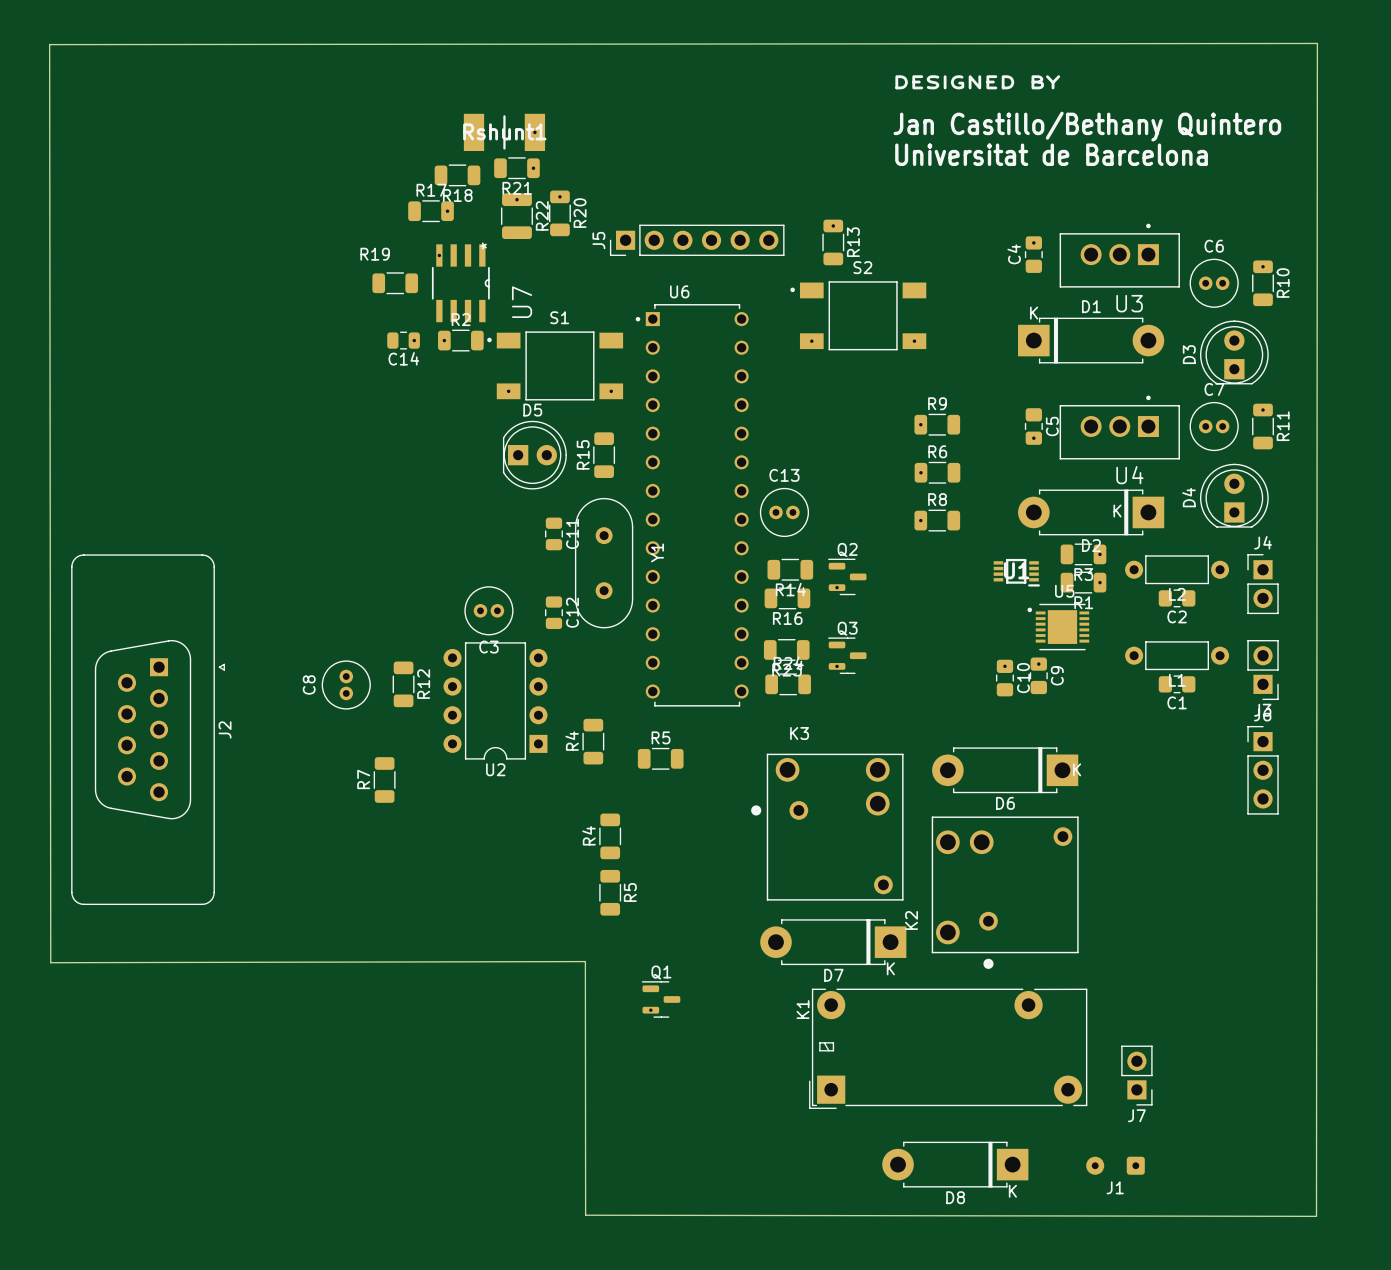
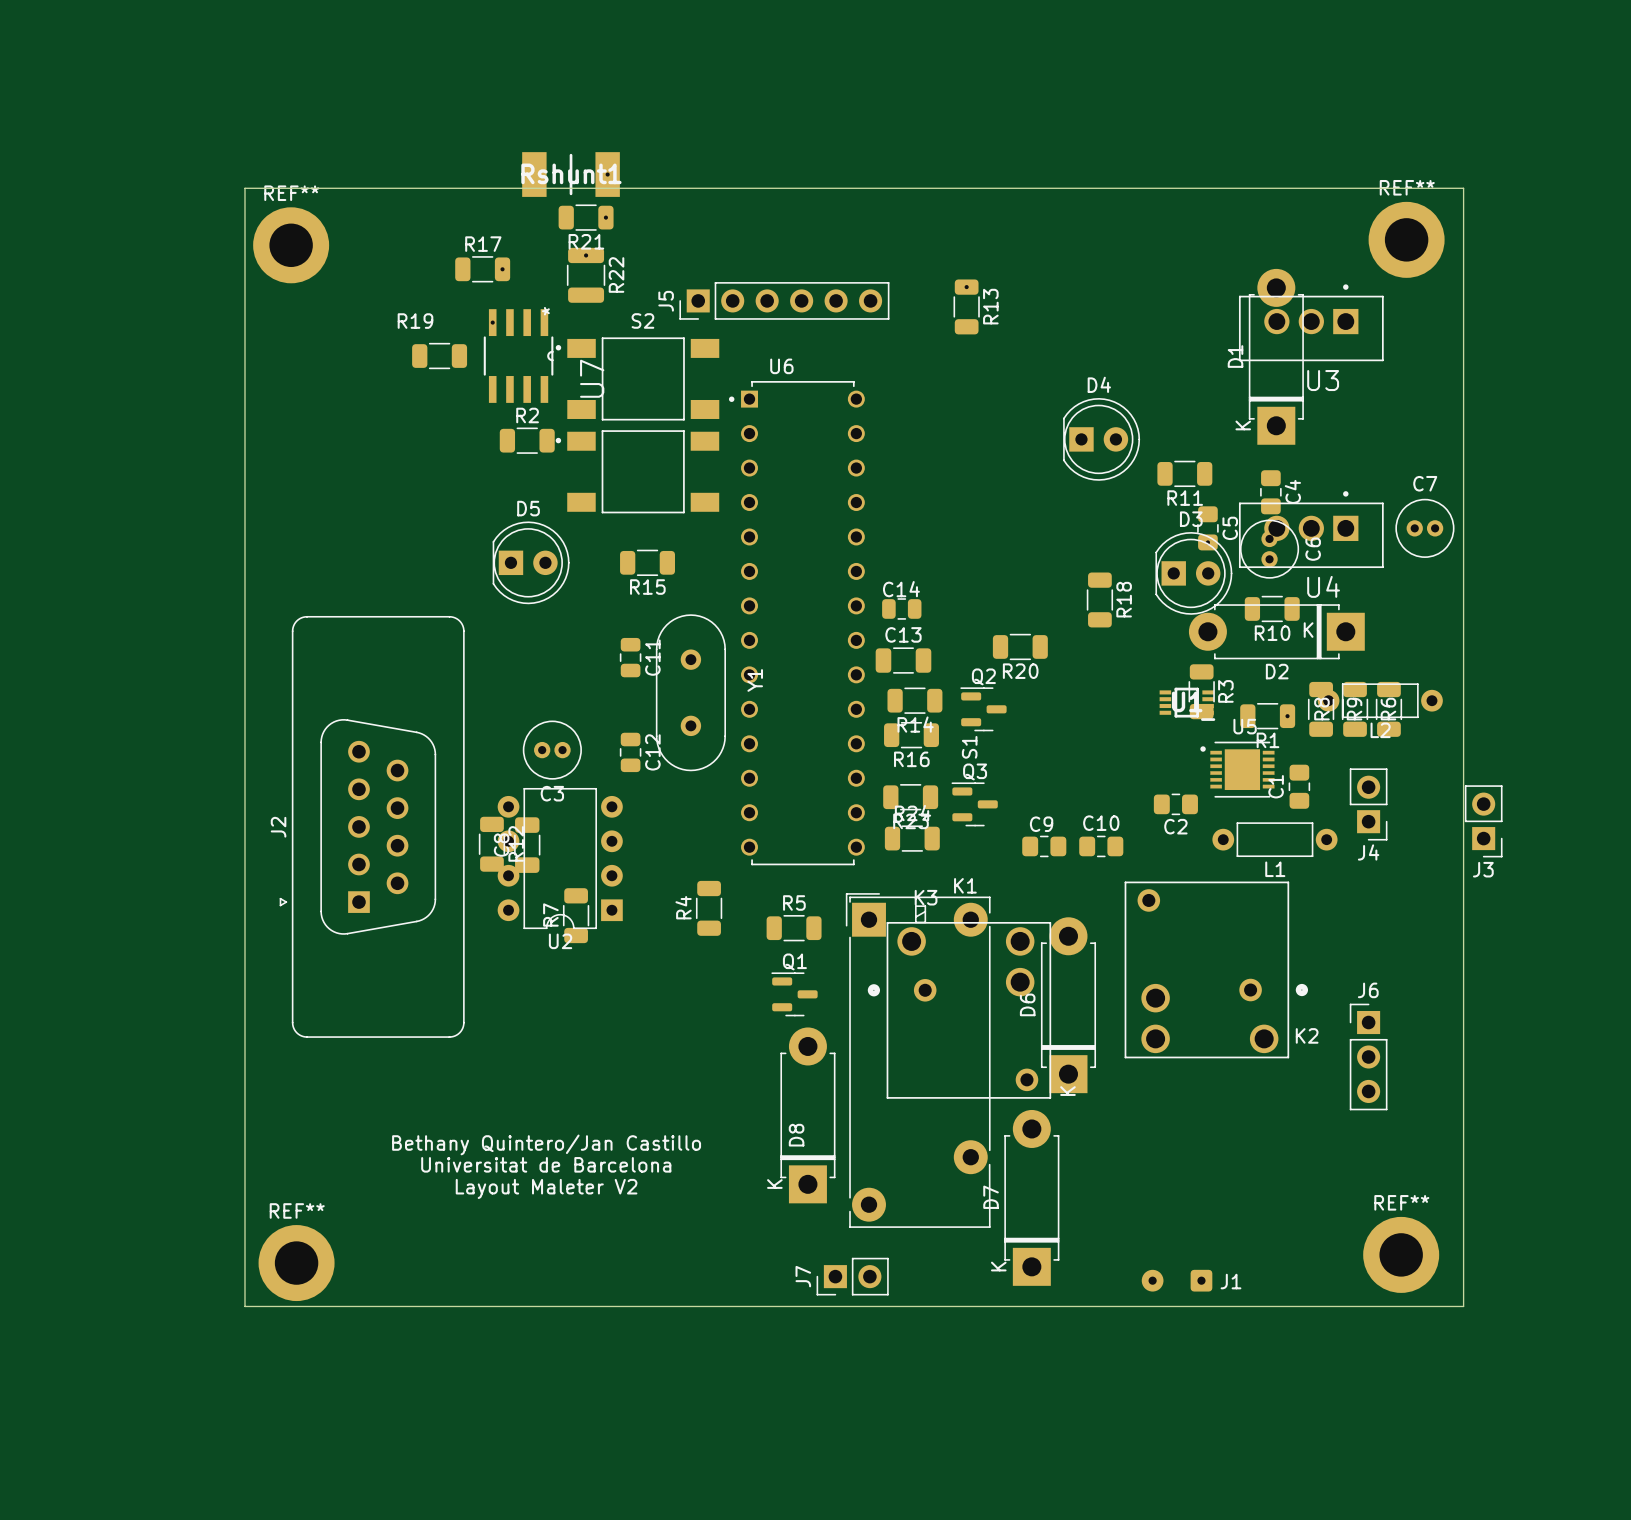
board edge: (1317, 43) (49, 44) (50, 962) (585, 961) (585, 1215) (1316, 1216) (1317, 43) -> (244, 188) (244, 1306) (1463, 1306) (1463, 188) (244, 188)
text: DESIGNED BY (977, 82) -> none
text: Jan Castillo/Bethany Quintero (1087, 126) -> none
text: Universitat de Barcelona (1051, 154) -> none
R18 rotation: 0° (457, 175) -> 90° clockwise (1099, 599)
R18 position: (457, 175) -> (1099, 599)
REF**: none -> (1406, 239)
R20 footprint: [549, 190, 571, 237] -> [992, 633, 1048, 661]
REF**: none -> (291, 245)
R18 name position: R18 (457, 195) -> R18 (1124, 599)
R20 name position: R20 (580, 213) -> R20 (1020, 671)
C4 footprint: [1024, 236, 1043, 273] -> [1260, 470, 1282, 515]
J5 position: (697, 240) -> (784, 300)
C4 name position: C4 (1014, 254) -> C4 (1292, 491)
R10 footprint: [1252, 260, 1274, 307] -> [1244, 595, 1300, 623]
S2 footprint: [790, 281, 927, 351] -> [555, 337, 720, 421]
C6 rotation: 0° (1214, 283) -> 90° clockwise (1269, 549)
C6 position: (1214, 283) -> (1269, 549)
R10 name position: R10 (1283, 283) -> R10 (1272, 633)
S1 name position: S1 (559, 317) -> S1 (969, 747)
R2 footprint: [438, 329, 484, 352] -> [499, 427, 555, 454]
C14 footprint: [387, 331, 420, 350] -> [882, 598, 922, 620]
S1 footprint: [487, 331, 624, 401] -> [555, 430, 720, 514]
D1 rotation: 0° (1091, 340) -> 90° counterclockwise (1276, 356)
D3 rotation: 0° (1234, 352) -> 90° clockwise (1193, 573)
D3 position: (1234, 352) -> (1193, 573)
C14 name position: C14 (403, 358) -> C14 (901, 589)
R11 footprint: [1252, 403, 1274, 450] -> [1157, 460, 1213, 488]
R9 footprint: [914, 413, 961, 436] -> [1341, 681, 1369, 737]
R11 name position: R11 (1283, 426) -> R11 (1185, 498)
R15 name position: R15 (583, 454) -> R15 (647, 587)
D5 position: (534, 455) -> (531, 562)
R15 rotation: 0° (604, 455) -> 90° clockwise (647, 562)
R15 position: (604, 455) -> (647, 562)
R6 footprint: [914, 461, 961, 484] -> [1375, 681, 1403, 737]
D4 footprint: [1199, 463, 1269, 528] -> [1063, 398, 1141, 481]
C13 footprint: [759, 487, 810, 538] -> [875, 647, 932, 674]
D4 name position: D4 (1189, 497) -> D4 (1099, 384)
R8 footprint: [914, 509, 961, 532] -> [1307, 681, 1335, 737]
R3 footprint: [1060, 543, 1107, 566] -> [1188, 664, 1215, 720]
Q2 footprint: [828, 558, 867, 596] -> [960, 687, 1007, 732]
R3 name position: R3 (1083, 574) -> R3 (1225, 691)
J4 rotation: 0° (1263, 584) -> 180° (1368, 804)
J4 position: (1263, 584) -> (1368, 804)
C2 position: (1177, 598) -> (1175, 804)
Q3 footprint: [828, 637, 867, 674] -> [951, 782, 998, 827]
L1 position: (1177, 655) -> (1274, 839)
C9 footprint: [1029, 657, 1048, 695] -> [1022, 835, 1067, 858]
C10 footprint: [995, 659, 1014, 697] -> [1079, 835, 1124, 858]
C8 footprint: [321, 660, 371, 710] -> [514, 817, 541, 873]
C9 name position: C9 (1057, 675) -> C9 (1041, 824)
C10 name position: C10 (1023, 678) -> C10 (1101, 823)
R12 position: (403, 684) -> (491, 844)
C1 rotation: 0° (1177, 684) -> 90° clockwise (1299, 786)
C1 position: (1177, 684) -> (1299, 786)
J2 rotation: 0° (148, 729) -> 180° (372, 826)
R4 position: (593, 741) -> (709, 908)
R5 position: (660, 758) -> (794, 928)
D6 rotation: 0° (1005, 770) -> 90° clockwise (1068, 1005)
D6 position: (1005, 770) -> (1068, 1005)
J6 position: (1263, 770) -> (1368, 1056)
R7 position: (384, 779) -> (576, 915)
R4: (610, 836) -> none
R5: (610, 892) -> none
K2 rotation: 0° (1005, 892) -> 90° counterclockwise (1216, 969)
K2 position: (1005, 892) -> (1216, 969)
K2 name position: K2 (911, 920) -> K2 (1307, 1035)
text: none -> Bethany Quintero/Jan Castillo (546, 1144)
D7 rotation: 0° (833, 942) -> 90° clockwise (1031, 1197)
text: none -> Universitat de Barcelona (546, 1164)
text: none -> Layout Maleter V2 (546, 1188)
Q1 footprint: [641, 981, 681, 1018] -> [771, 972, 818, 1017]
REF**: none -> (1401, 1254)
REF**: none -> (296, 1263)
K1 rotation: 0° (948, 1048) -> 90° clockwise (918, 1060)
K1 position: (948, 1048) -> (918, 1060)
J7 rotation: 0° (1136, 1075) -> 90° clockwise (852, 1276)
J7 position: (1136, 1075) -> (852, 1276)
D8 rotation: 0° (955, 1164) -> 90° clockwise (807, 1115)
D8 position: (955, 1164) -> (807, 1115)
J1 position: (1115, 1165) -> (1177, 1280)
J1 name position: J1 (1115, 1187) -> J1 (1231, 1281)

